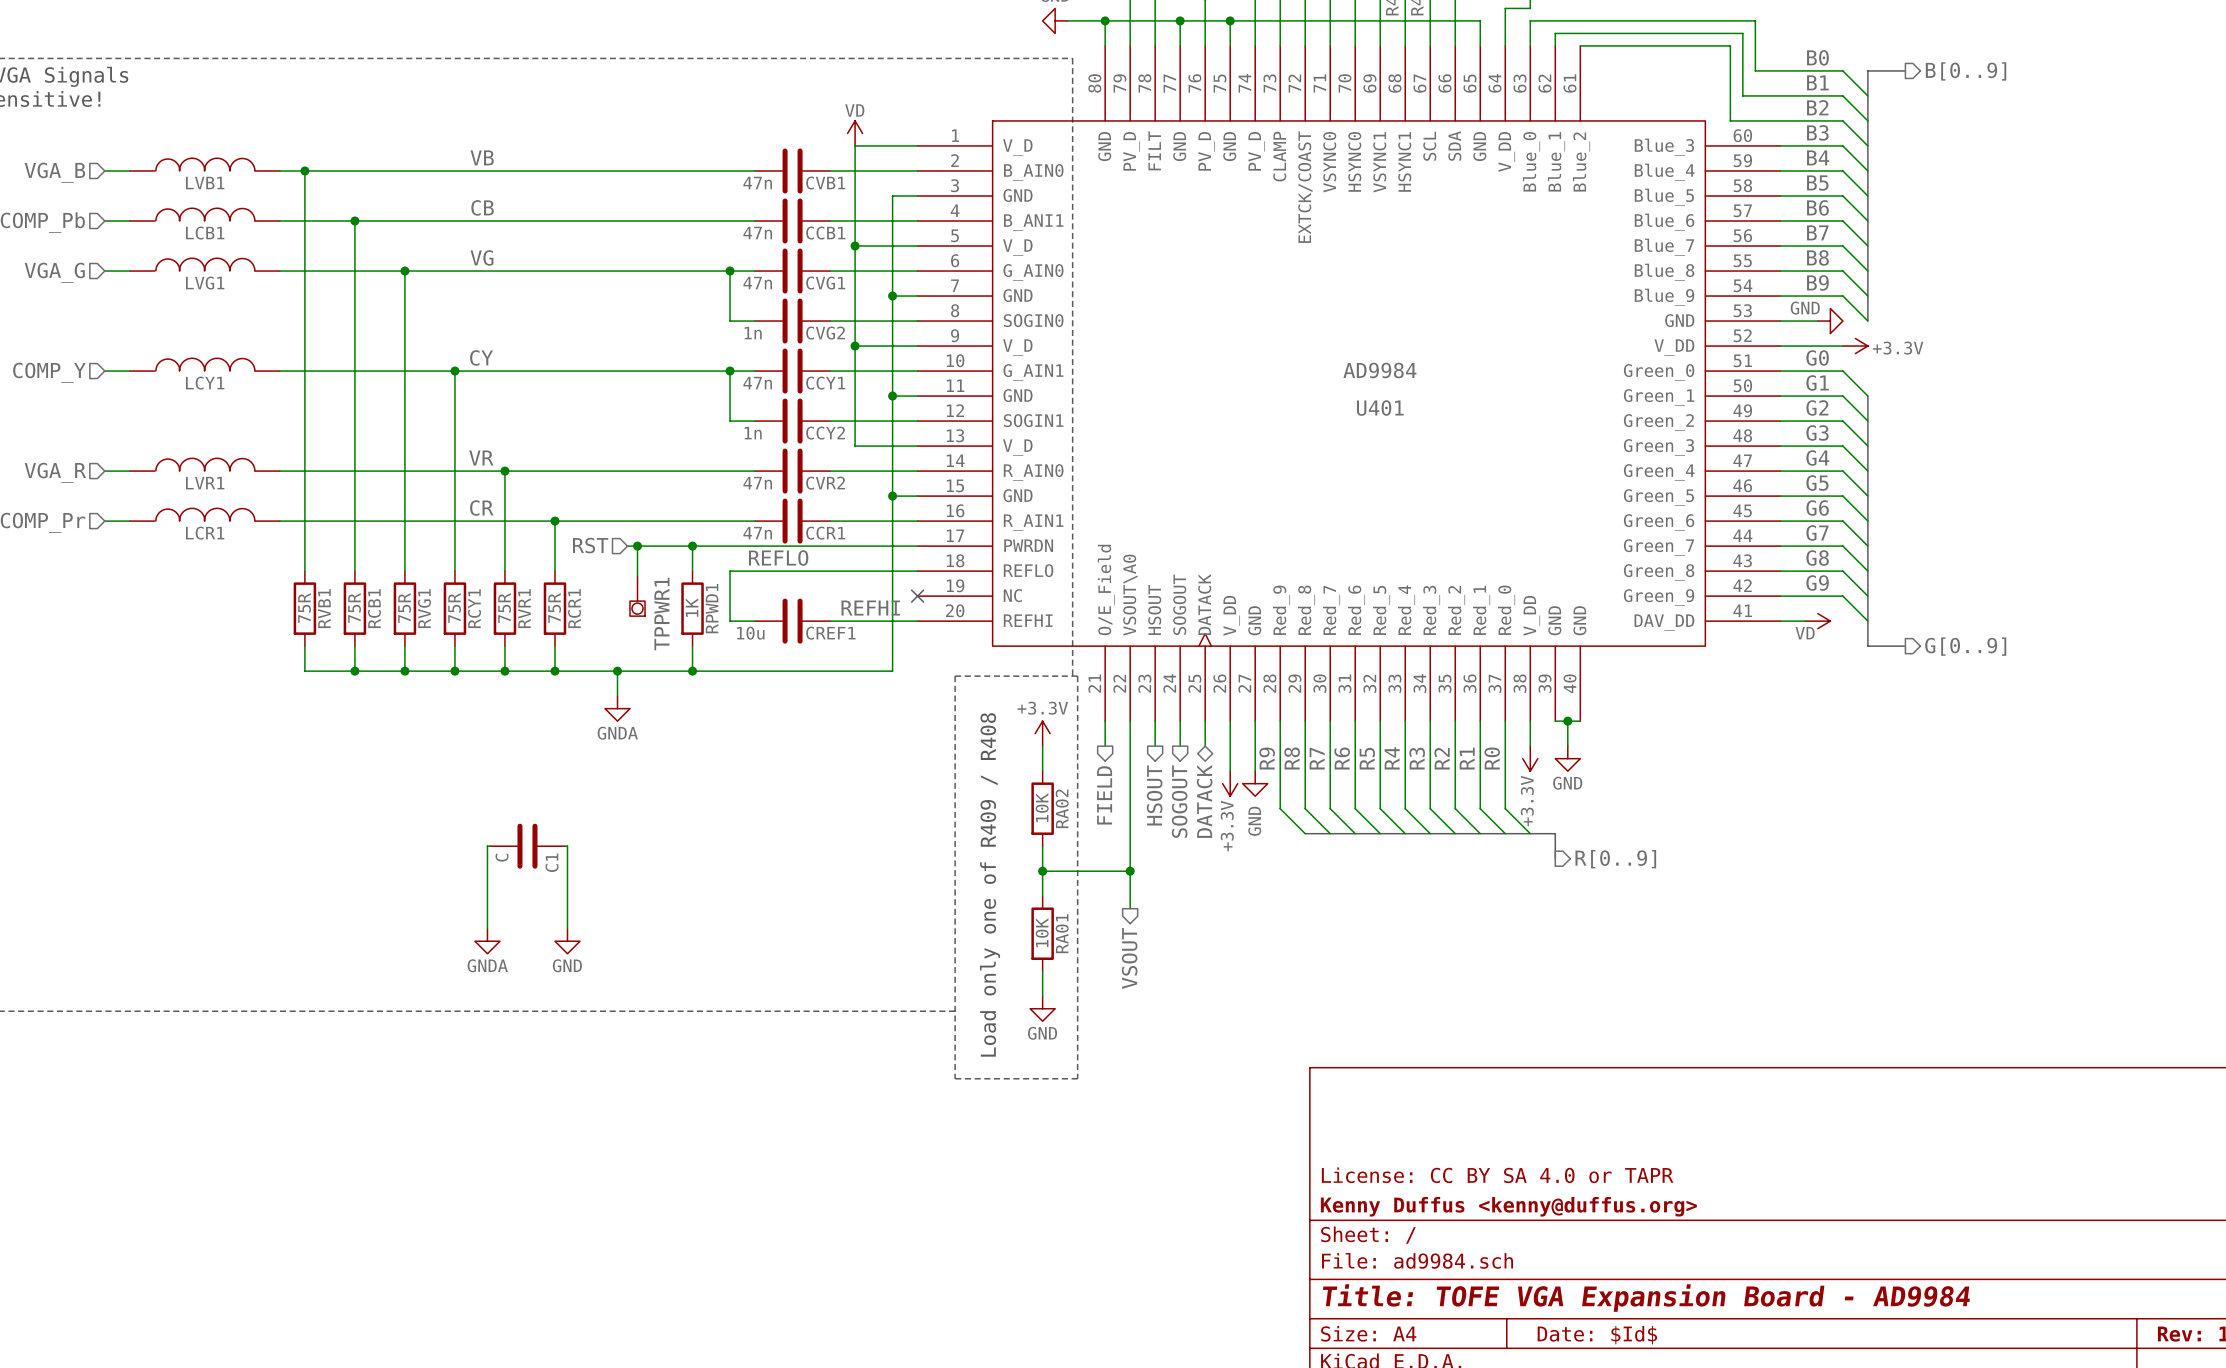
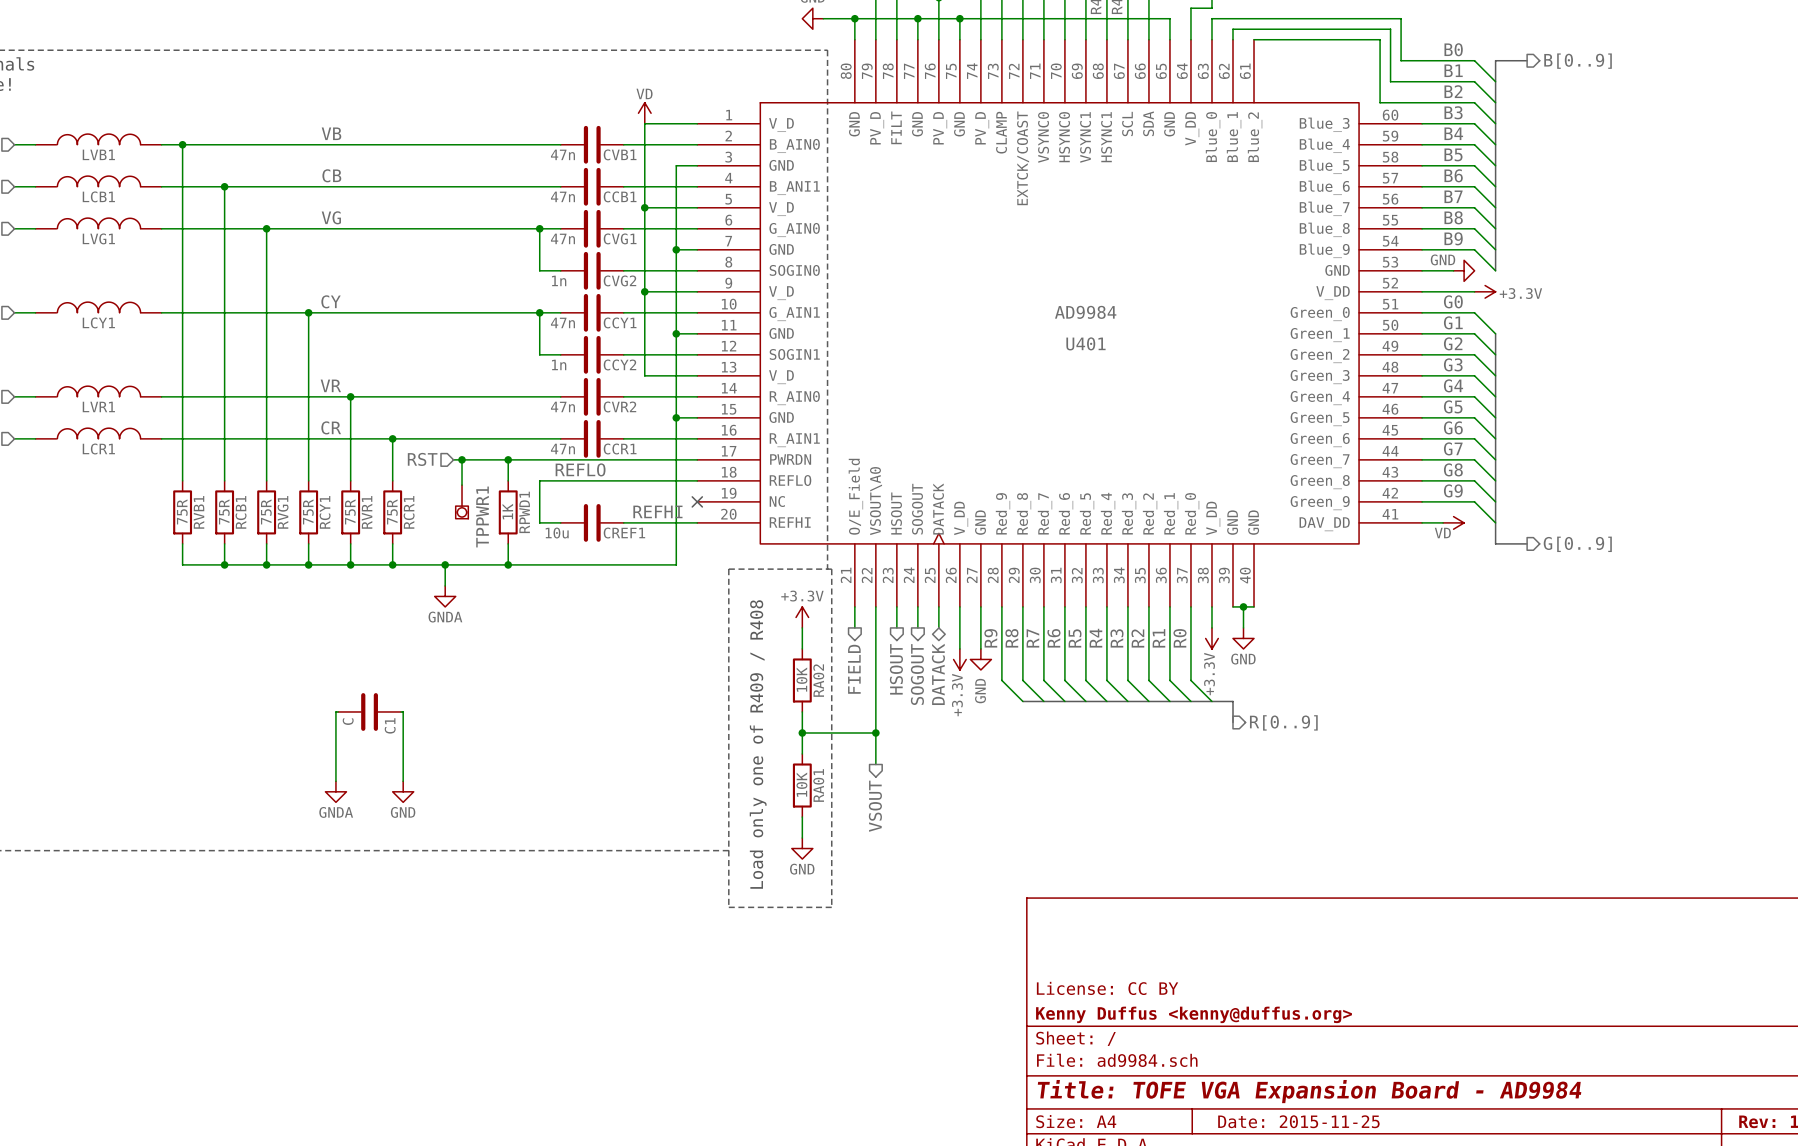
title block: License: CC BY SA 4.0 or TAPR (1497, 1175) -> License: CC BY (1107, 988)
title block: Date: $Id$ (1597, 1335) -> Date: 2015-11-25 (1298, 1121)

